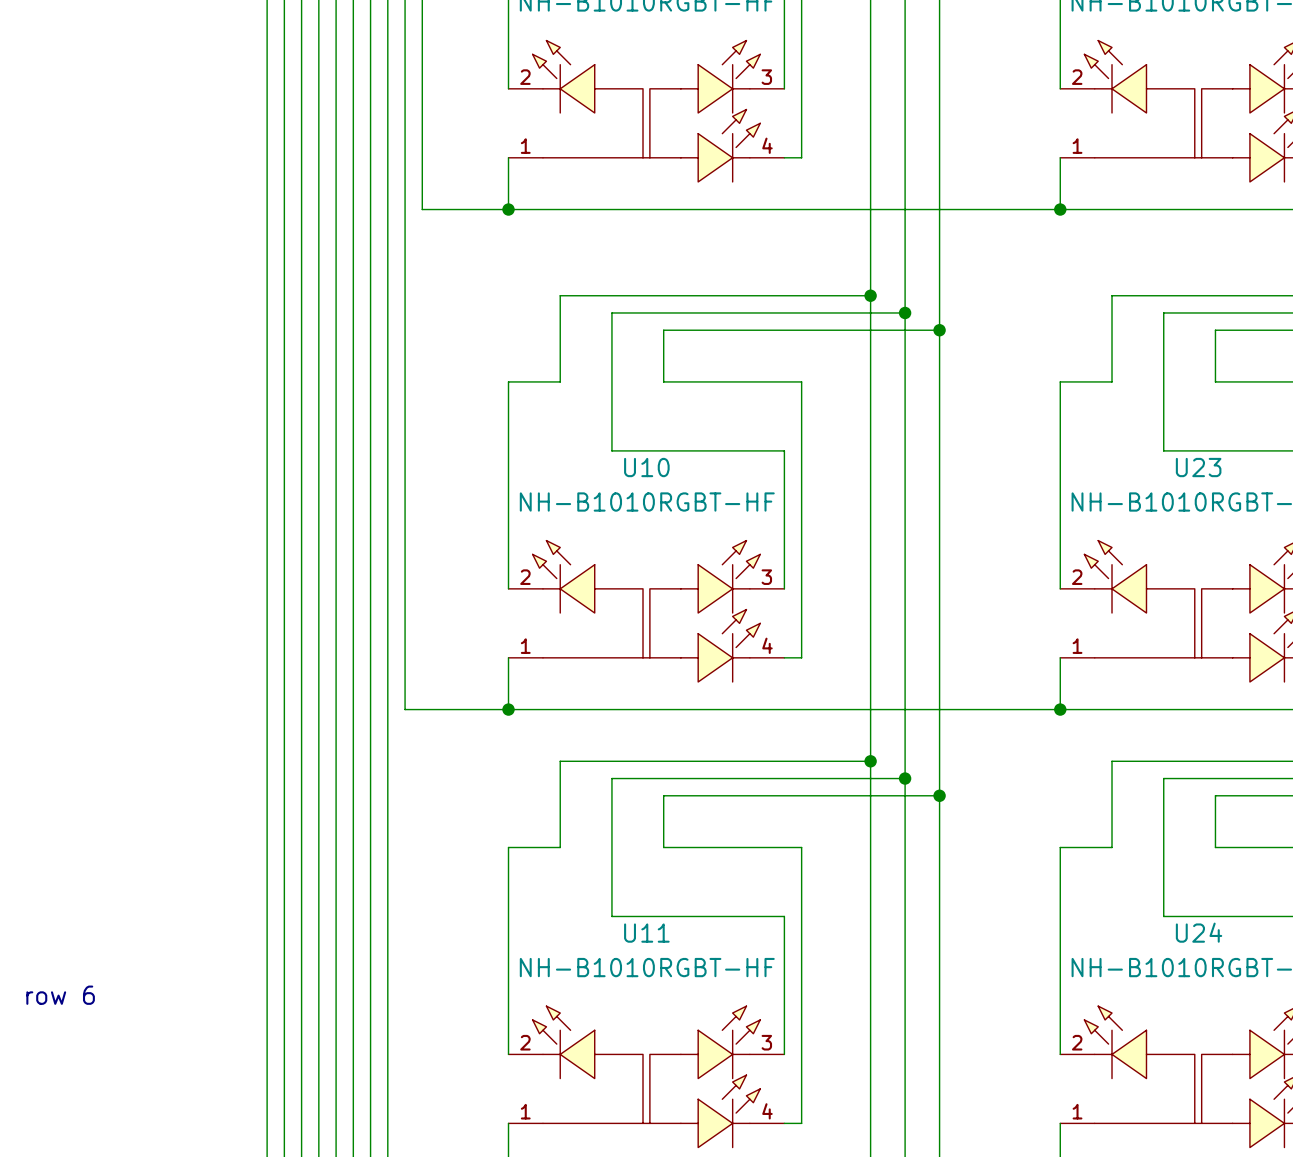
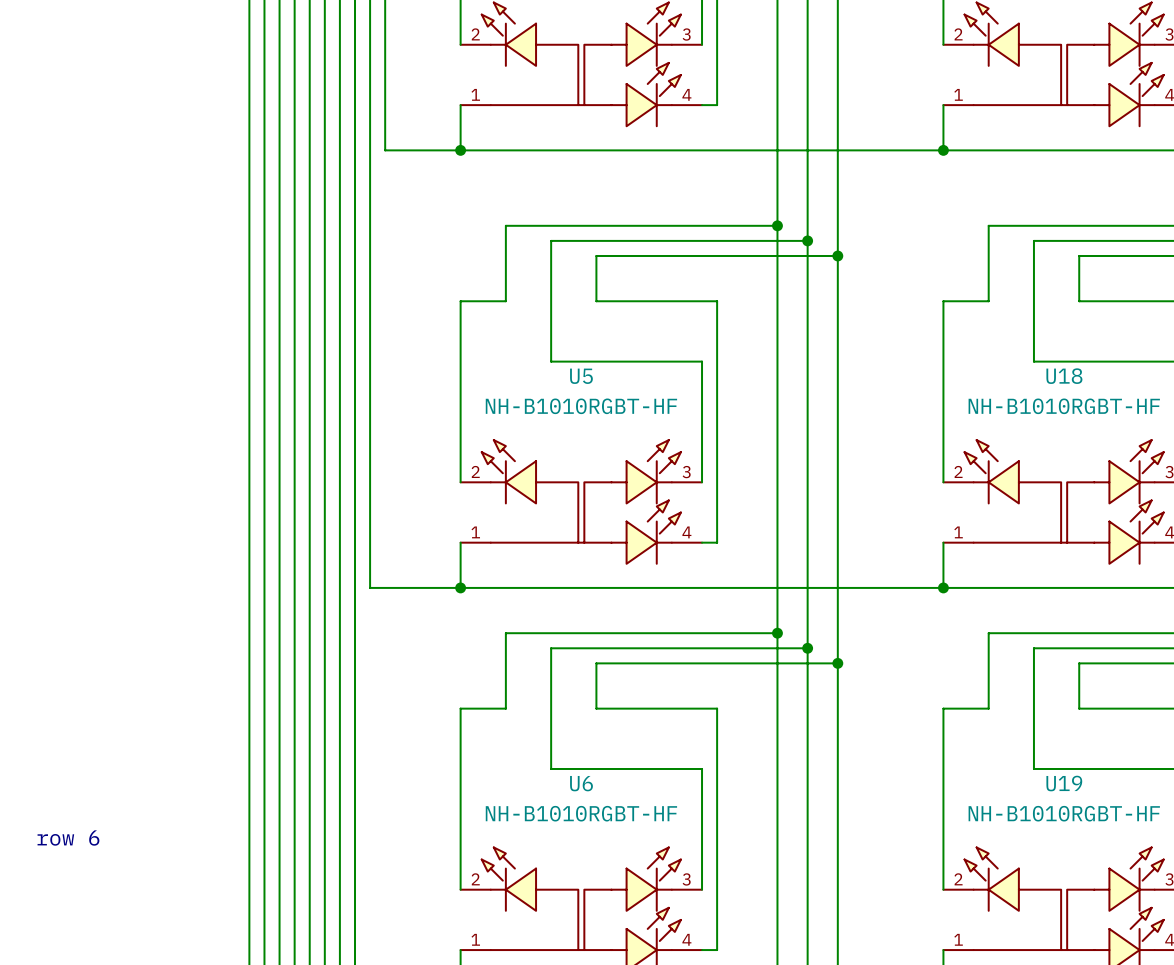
U10 name: U10 (646, 467) -> U5 (581, 376)
U23 name: U23 (1198, 467) -> U18 (1064, 376)
U24 name: U24 (1199, 932) -> U19 (1064, 783)
U11 name: U11 (646, 933) -> U6 (581, 783)

